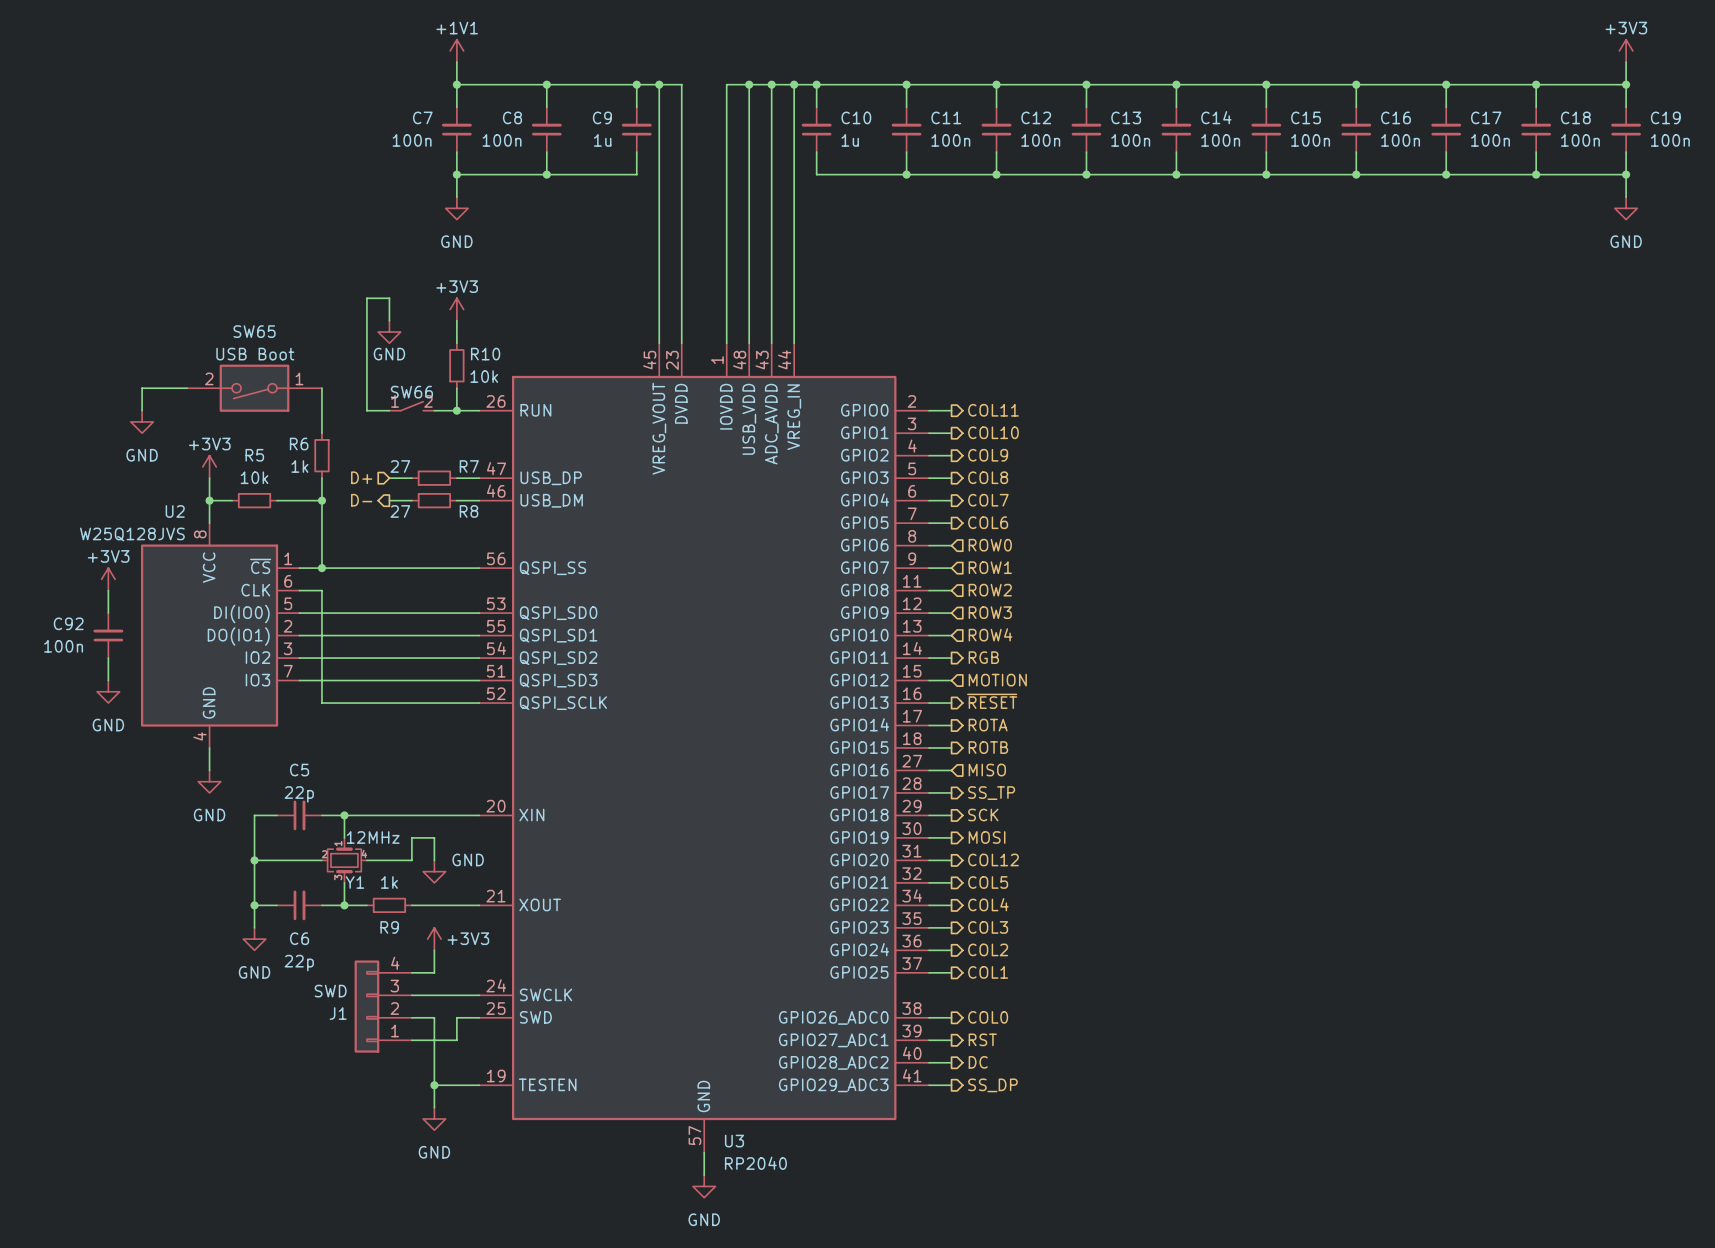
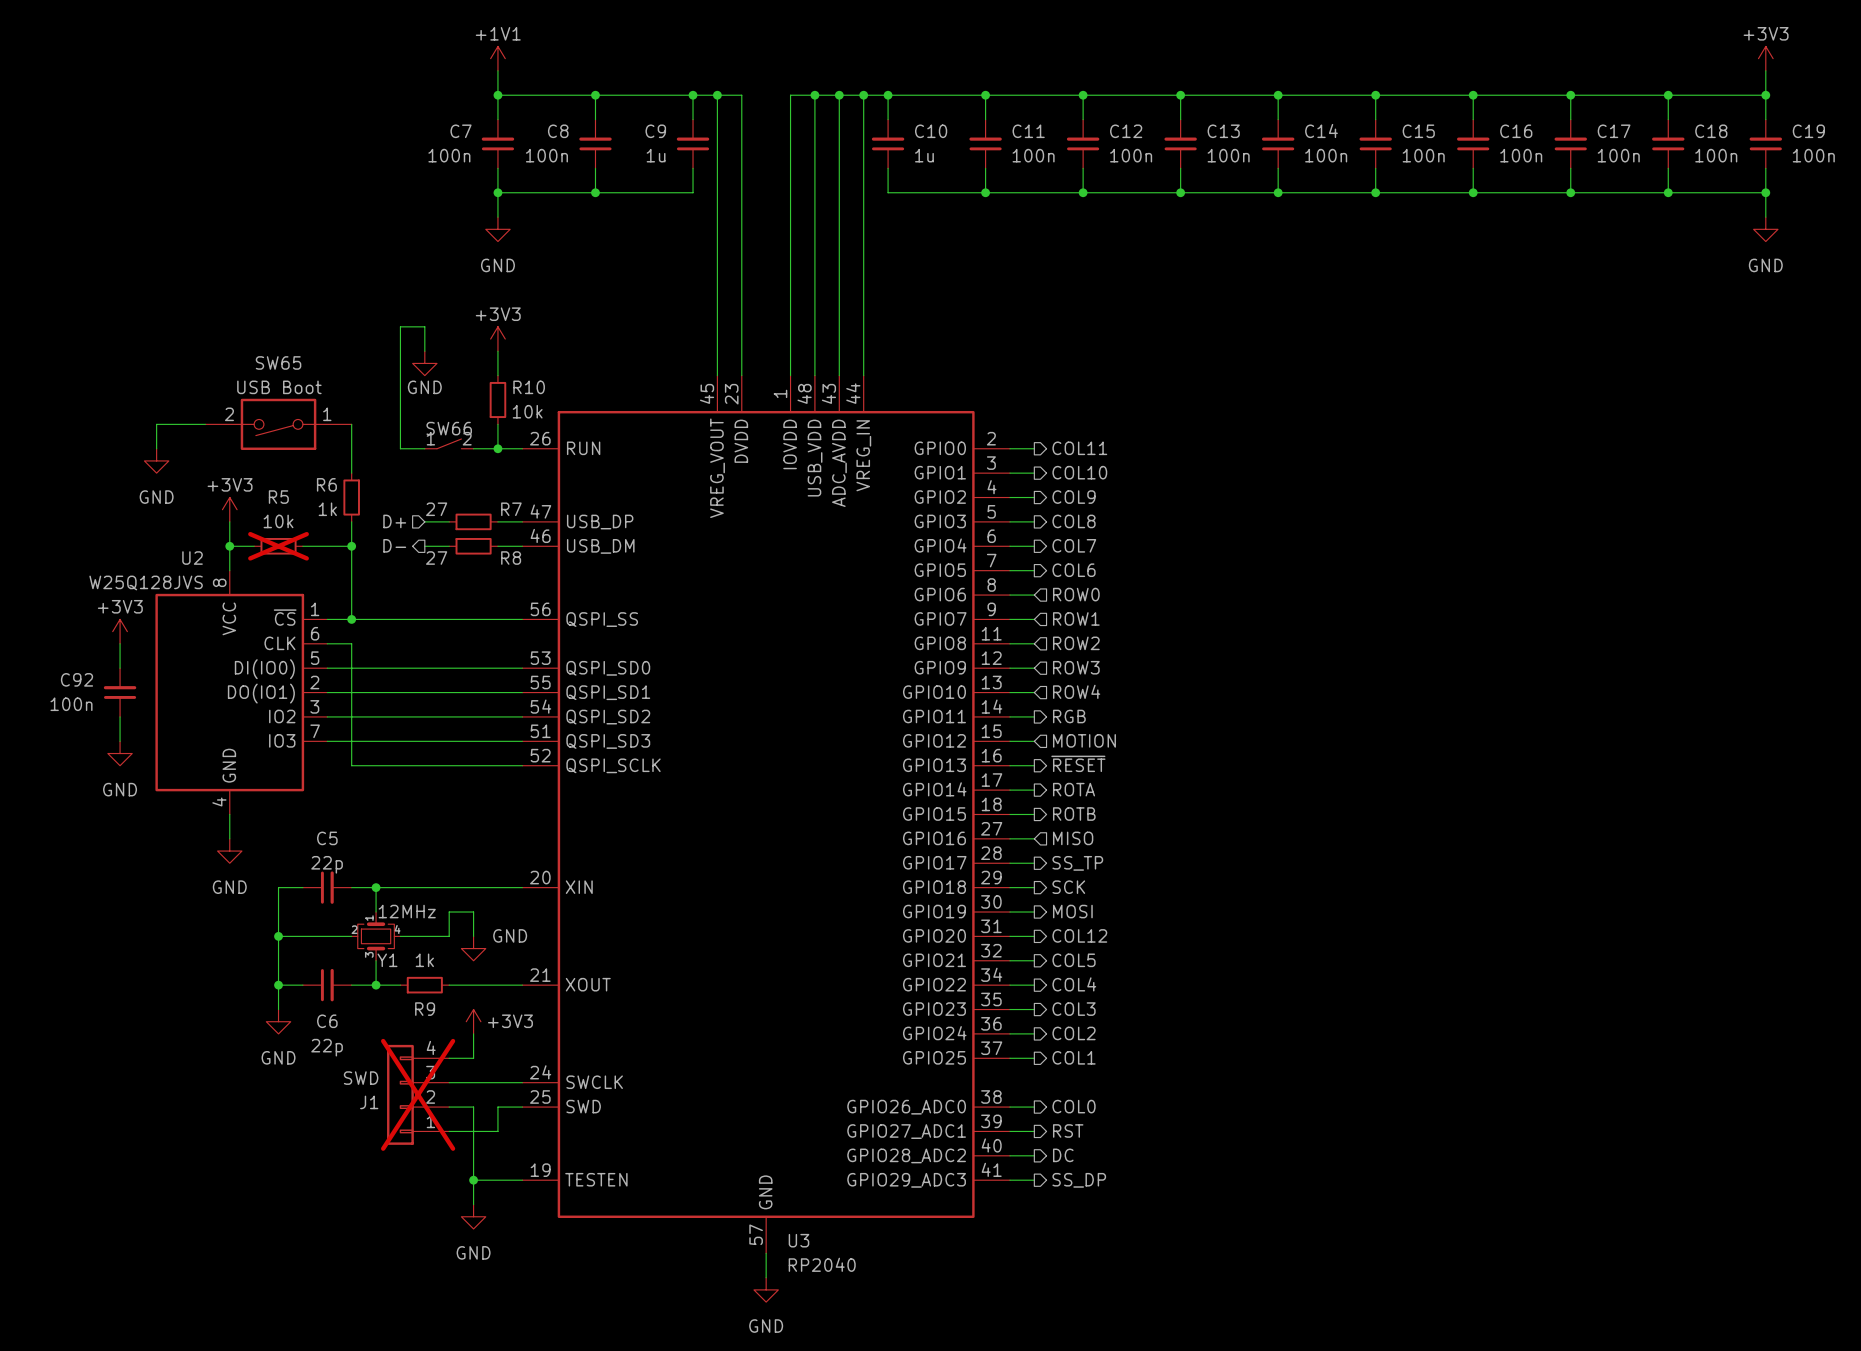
R5 do-not-place cross: none -> (278, 546)
J1 do-not-place cross: none -> (418, 1094)

